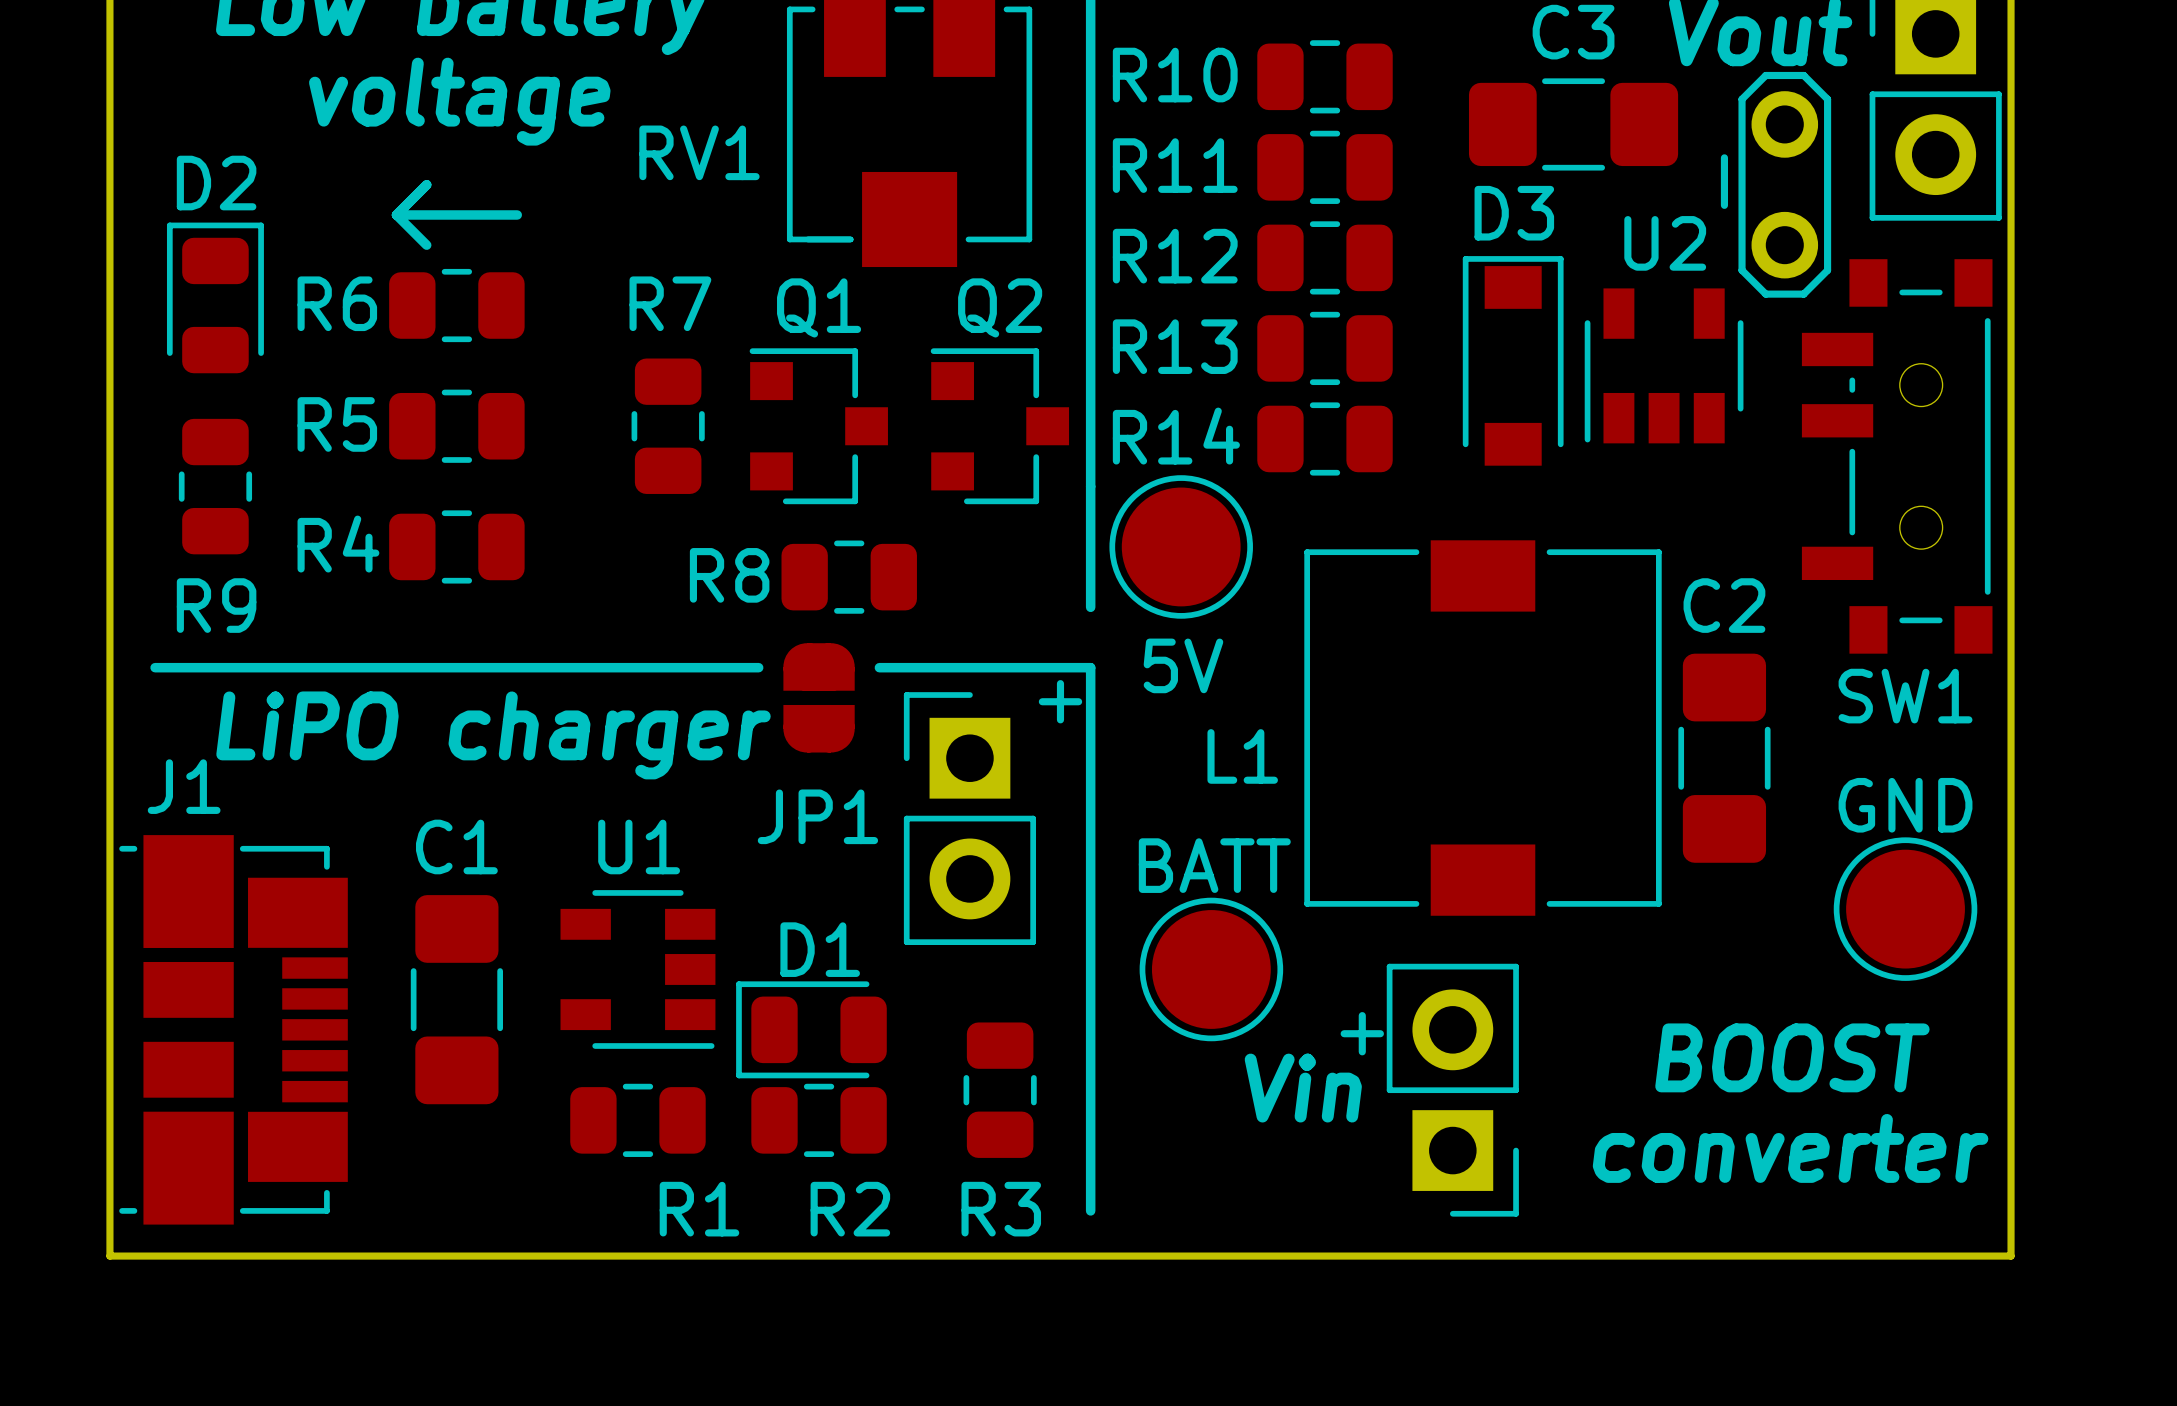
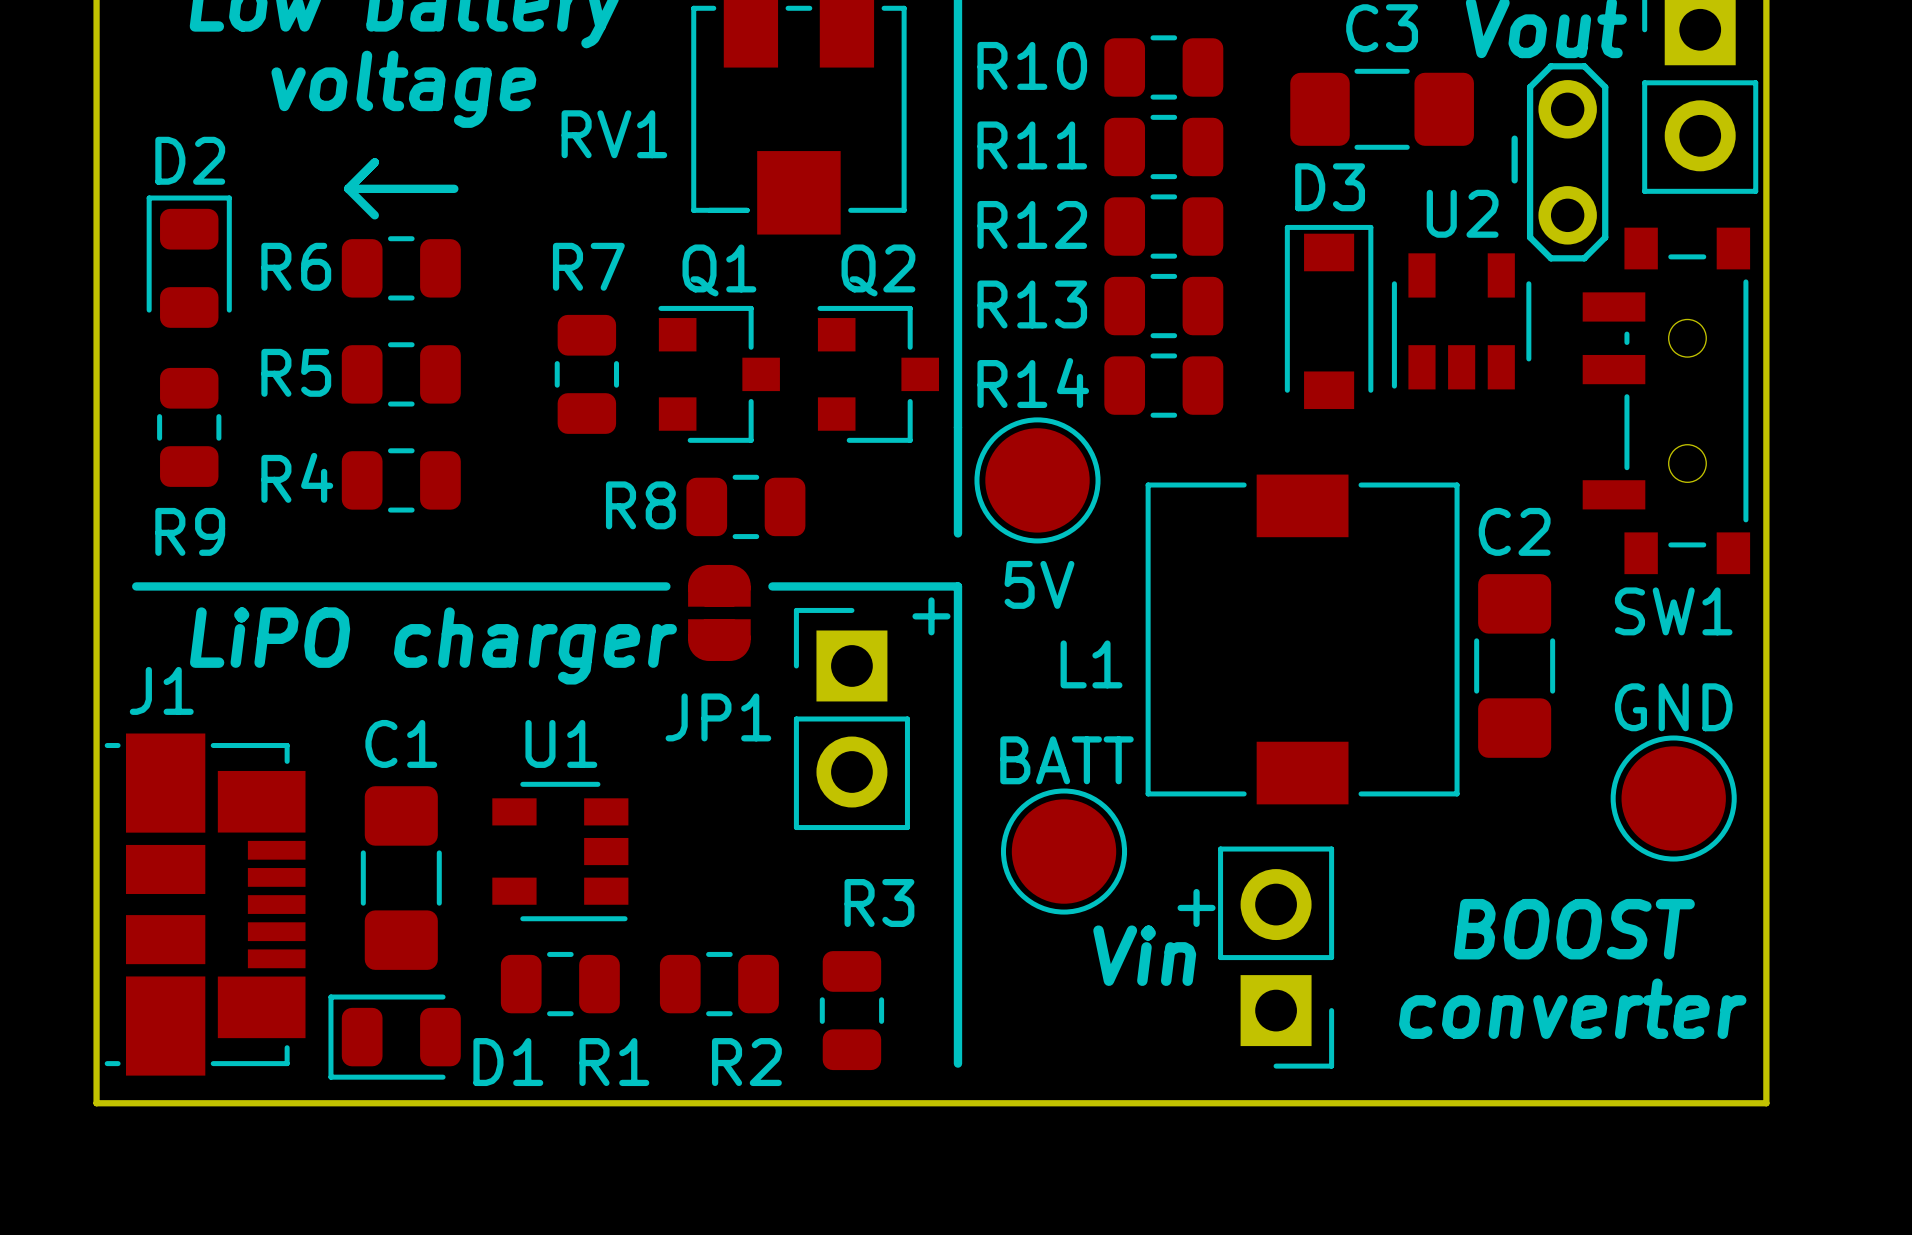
D1 name position: D1 (820, 949) -> D1 (508, 1062)
D1 position: (811, 1029) -> (394, 1037)
R3 position: (1000, 1090) -> (851, 1010)
R3 name position: R3 (1001, 1209) -> R3 (879, 902)

